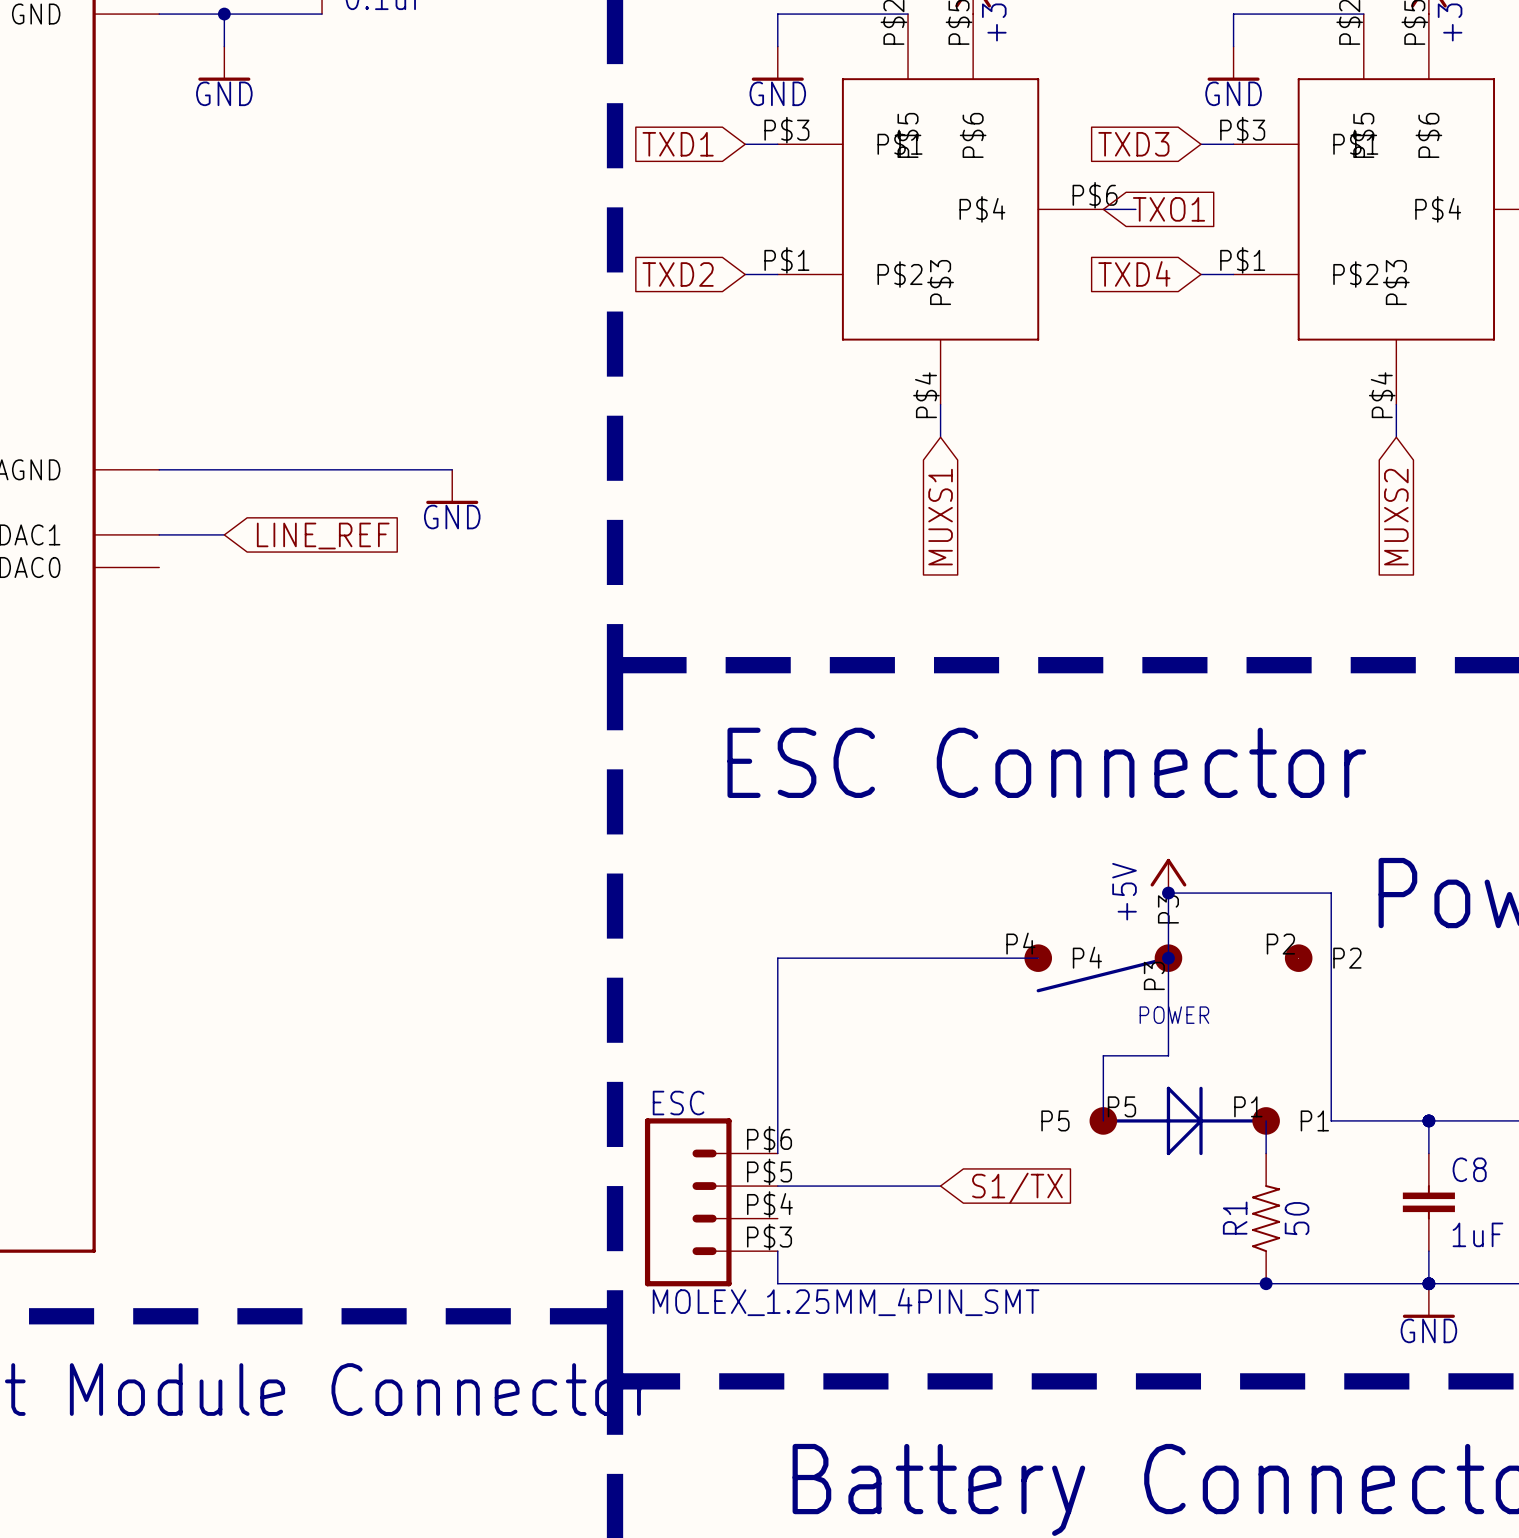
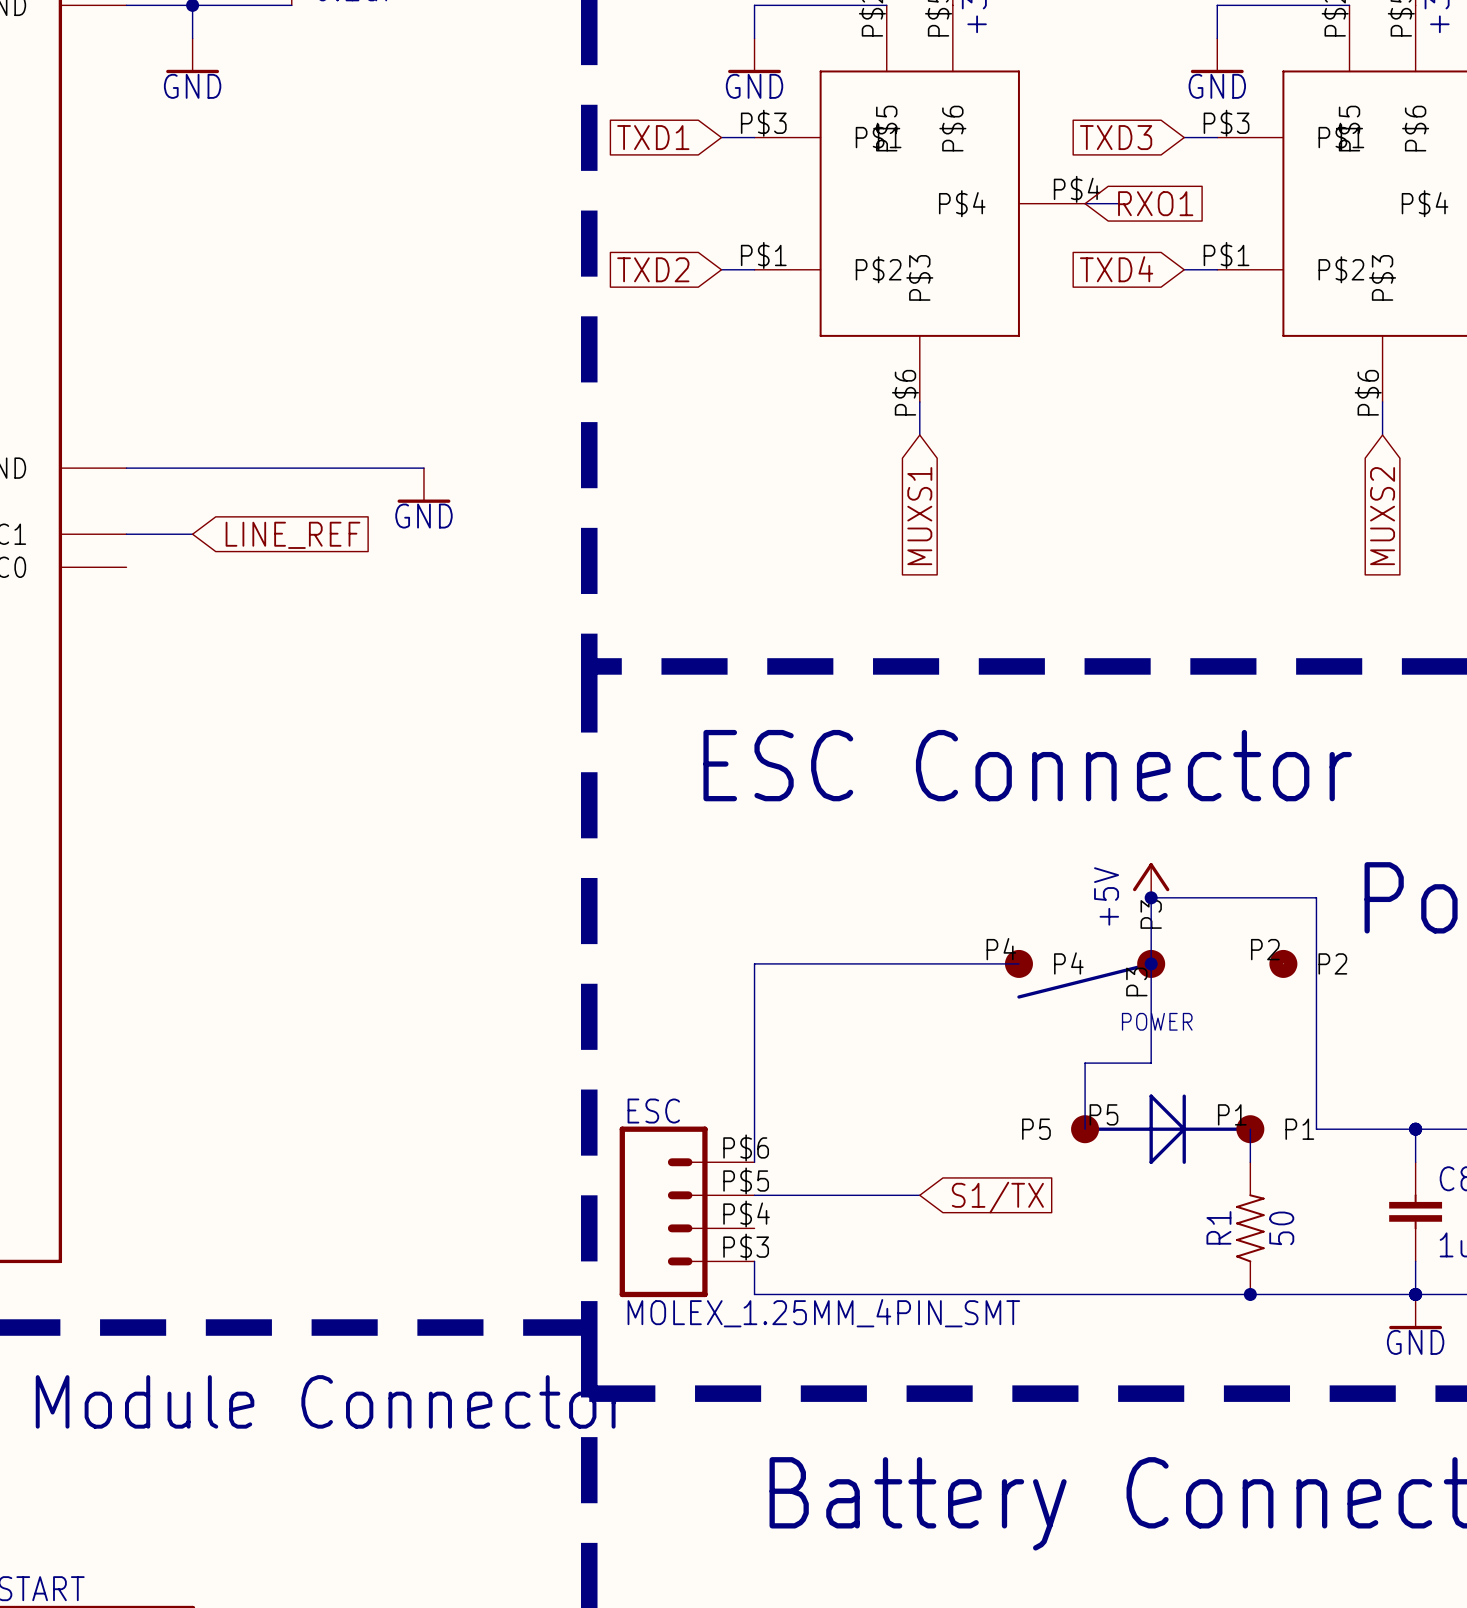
part pin number: P$6 (1095, 195) -> P$4 (1077, 189)
global label: TXO1 (1169, 209) -> RXO1 (1155, 203)
part pin number: P$4 (926, 395) -> P$6 (905, 392)
part pin number: P$4 (1382, 395) -> P$6 (1368, 392)

